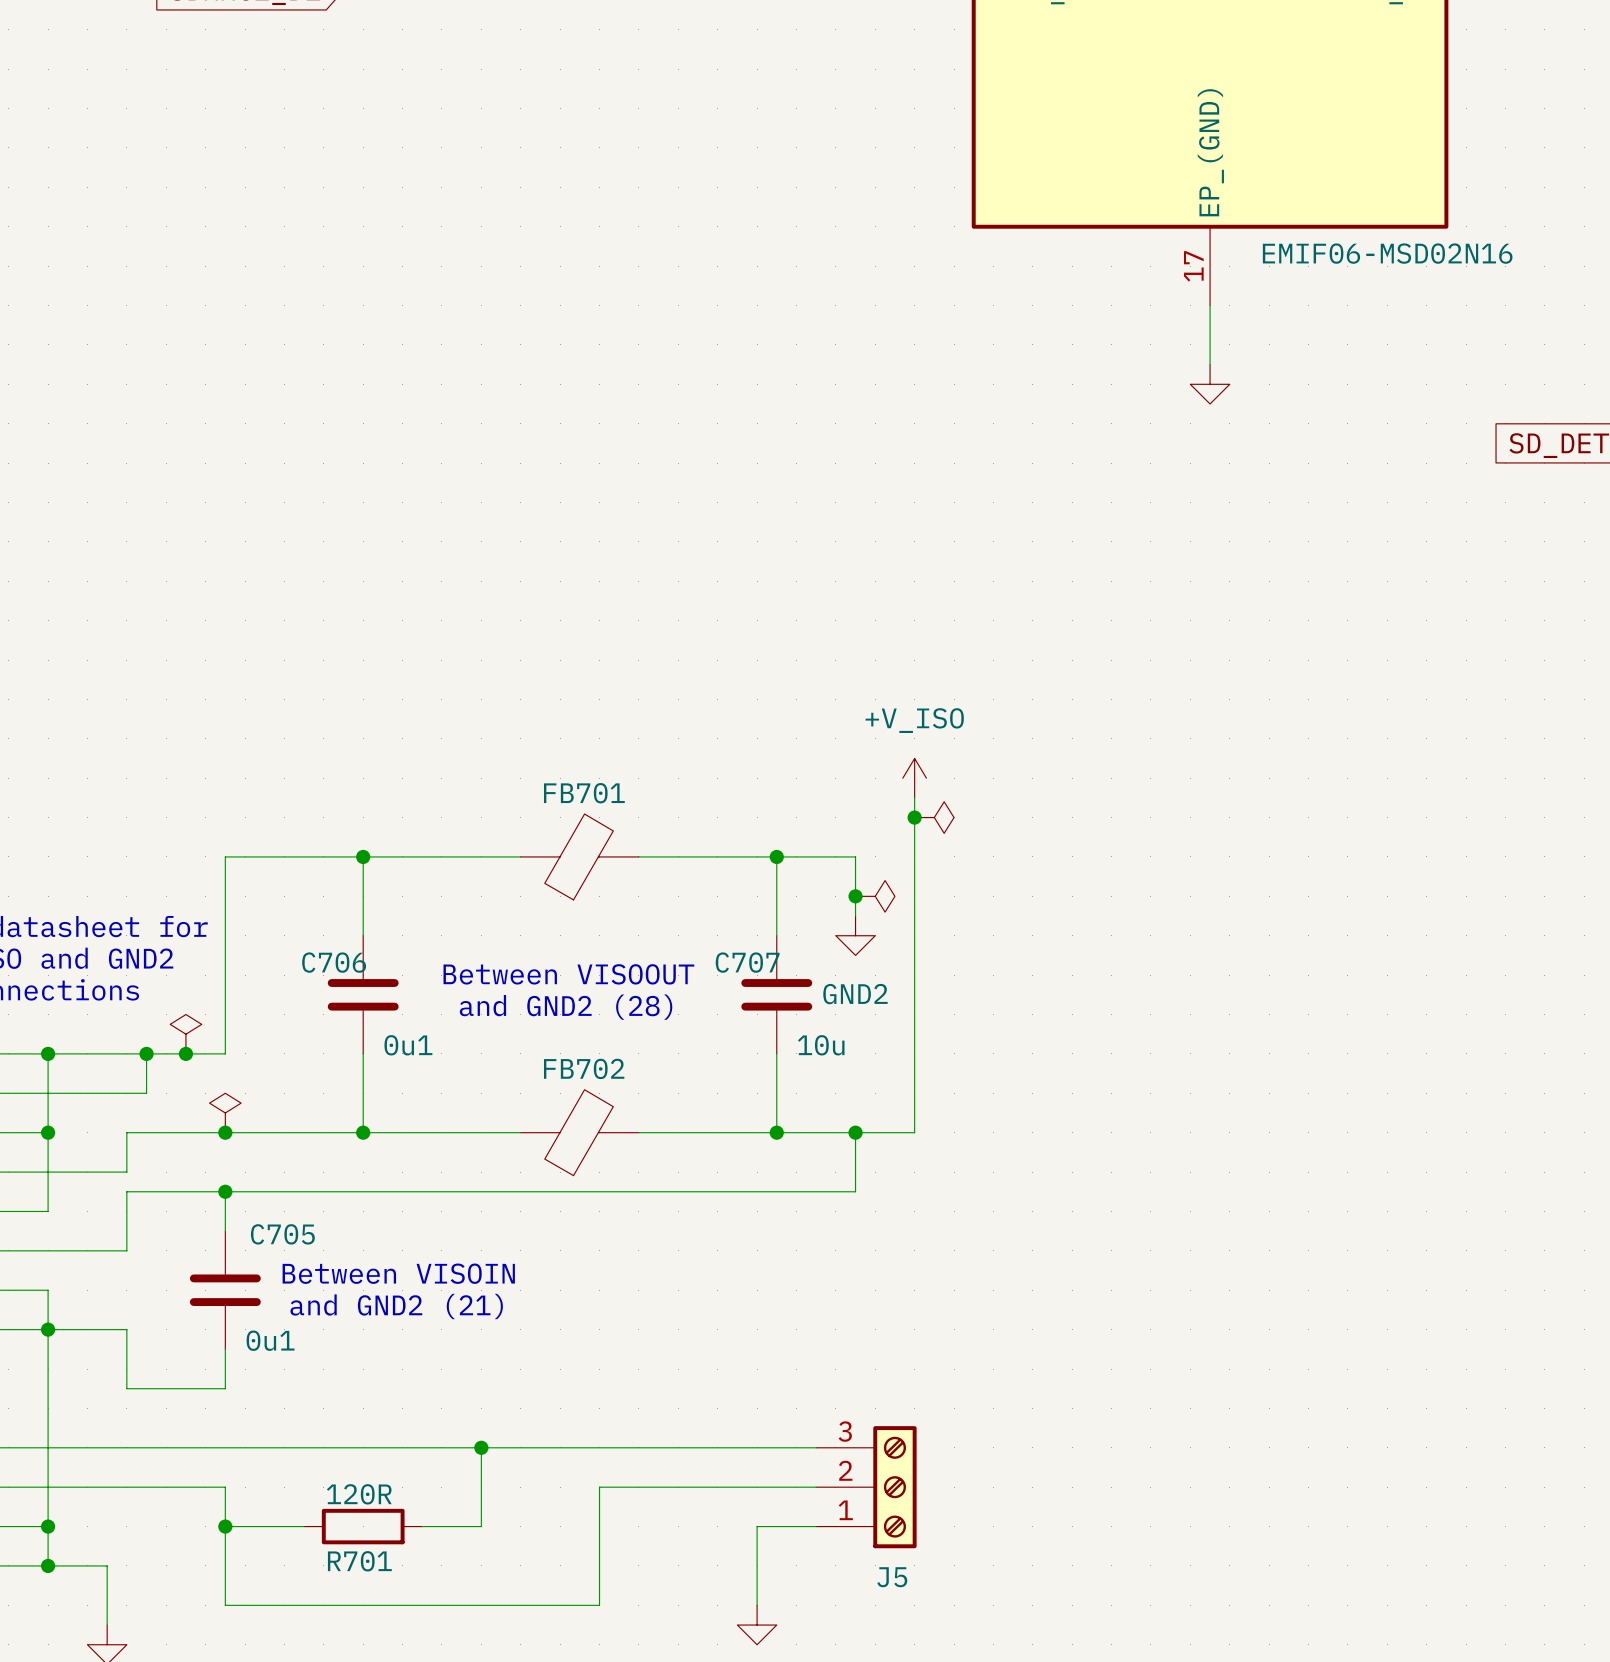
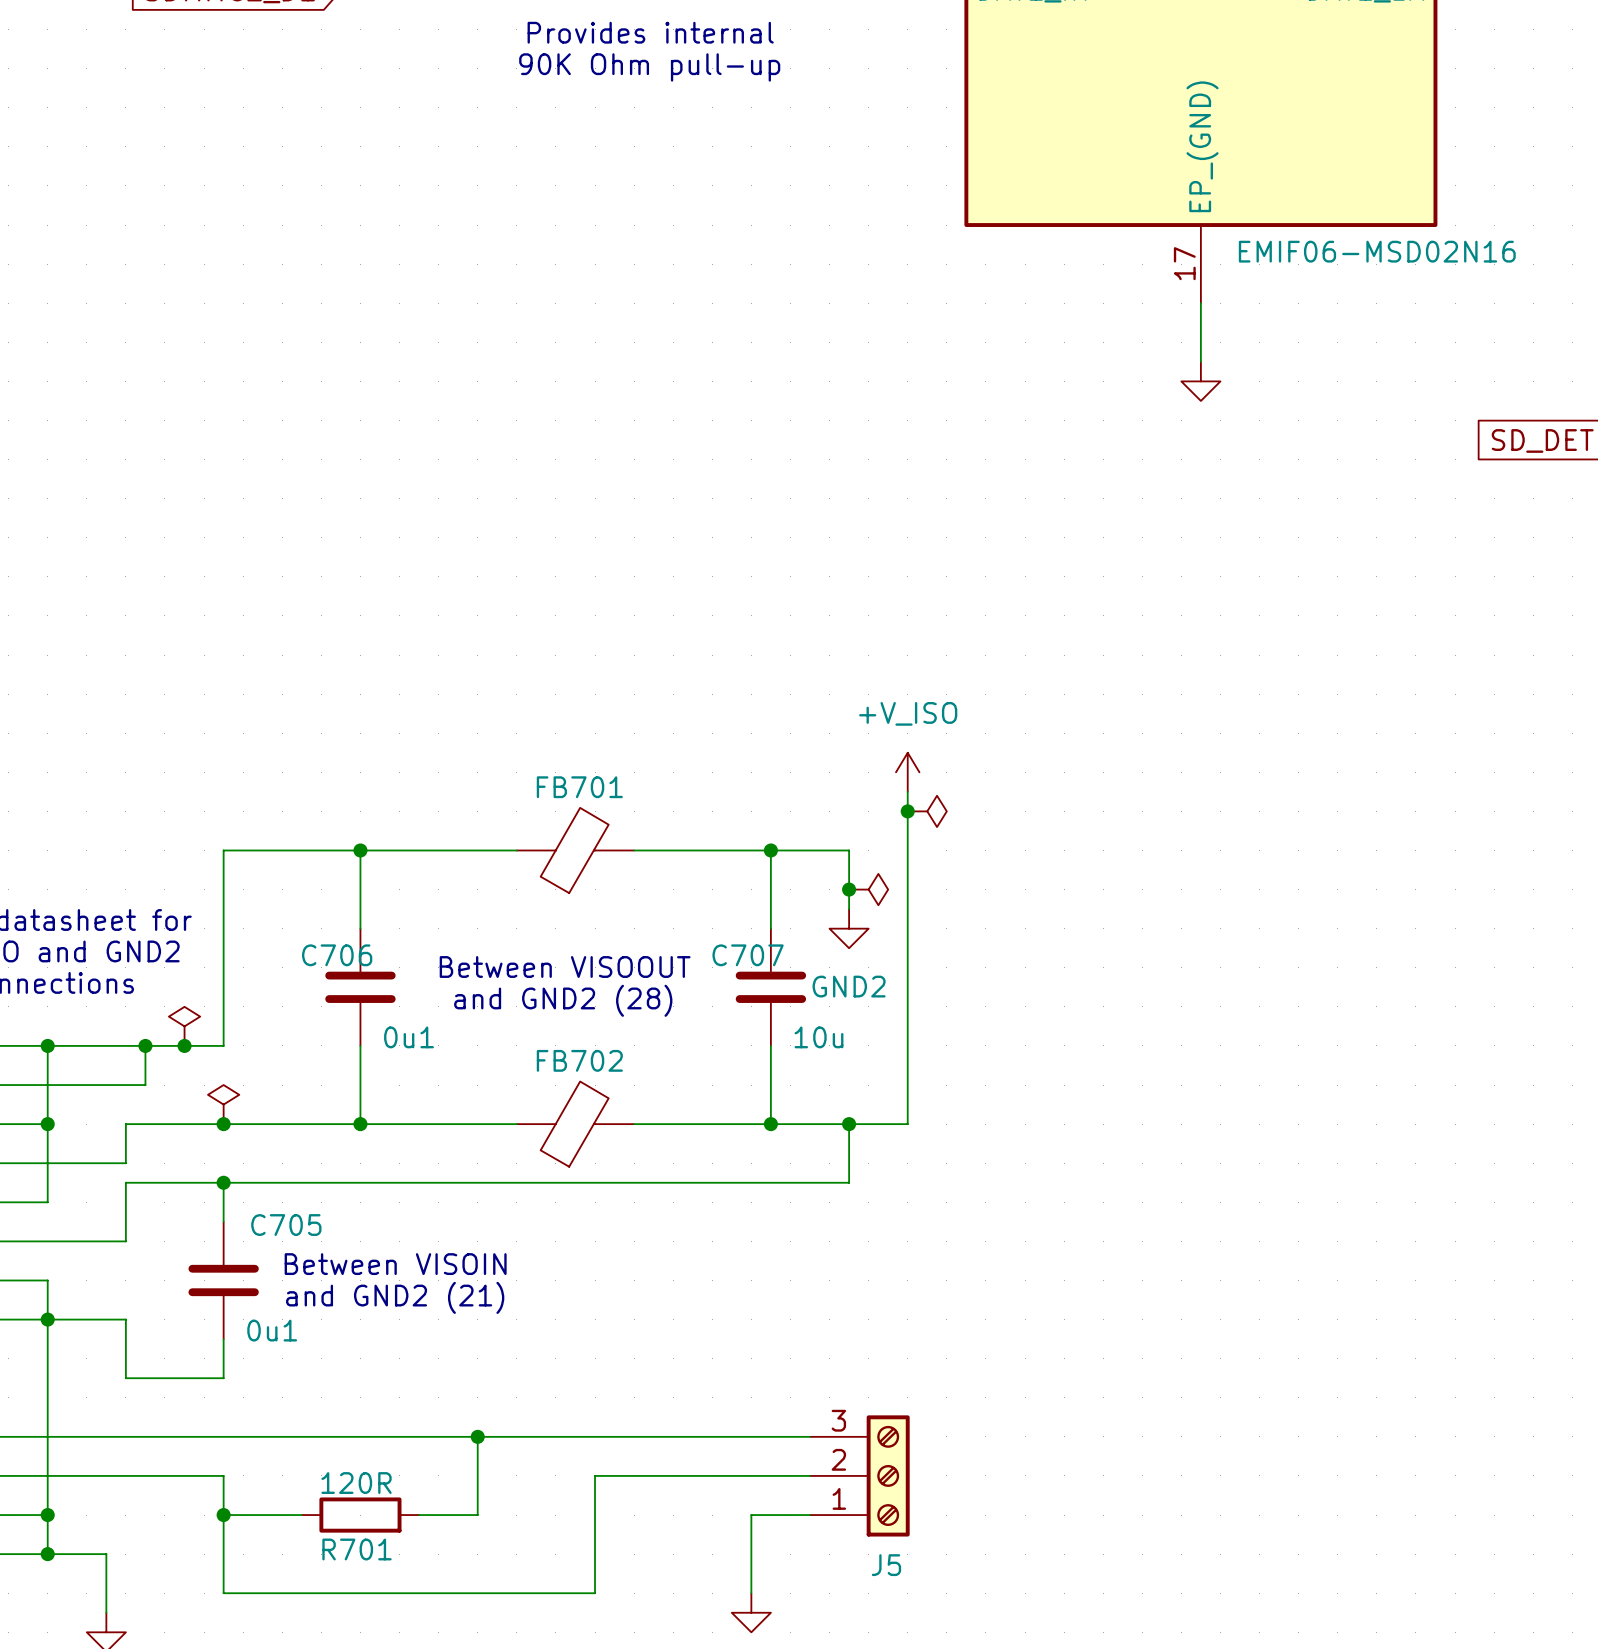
text: none -> Provides internal (650, 32)
text: none -> 90K Ohm pull-up (649, 67)

